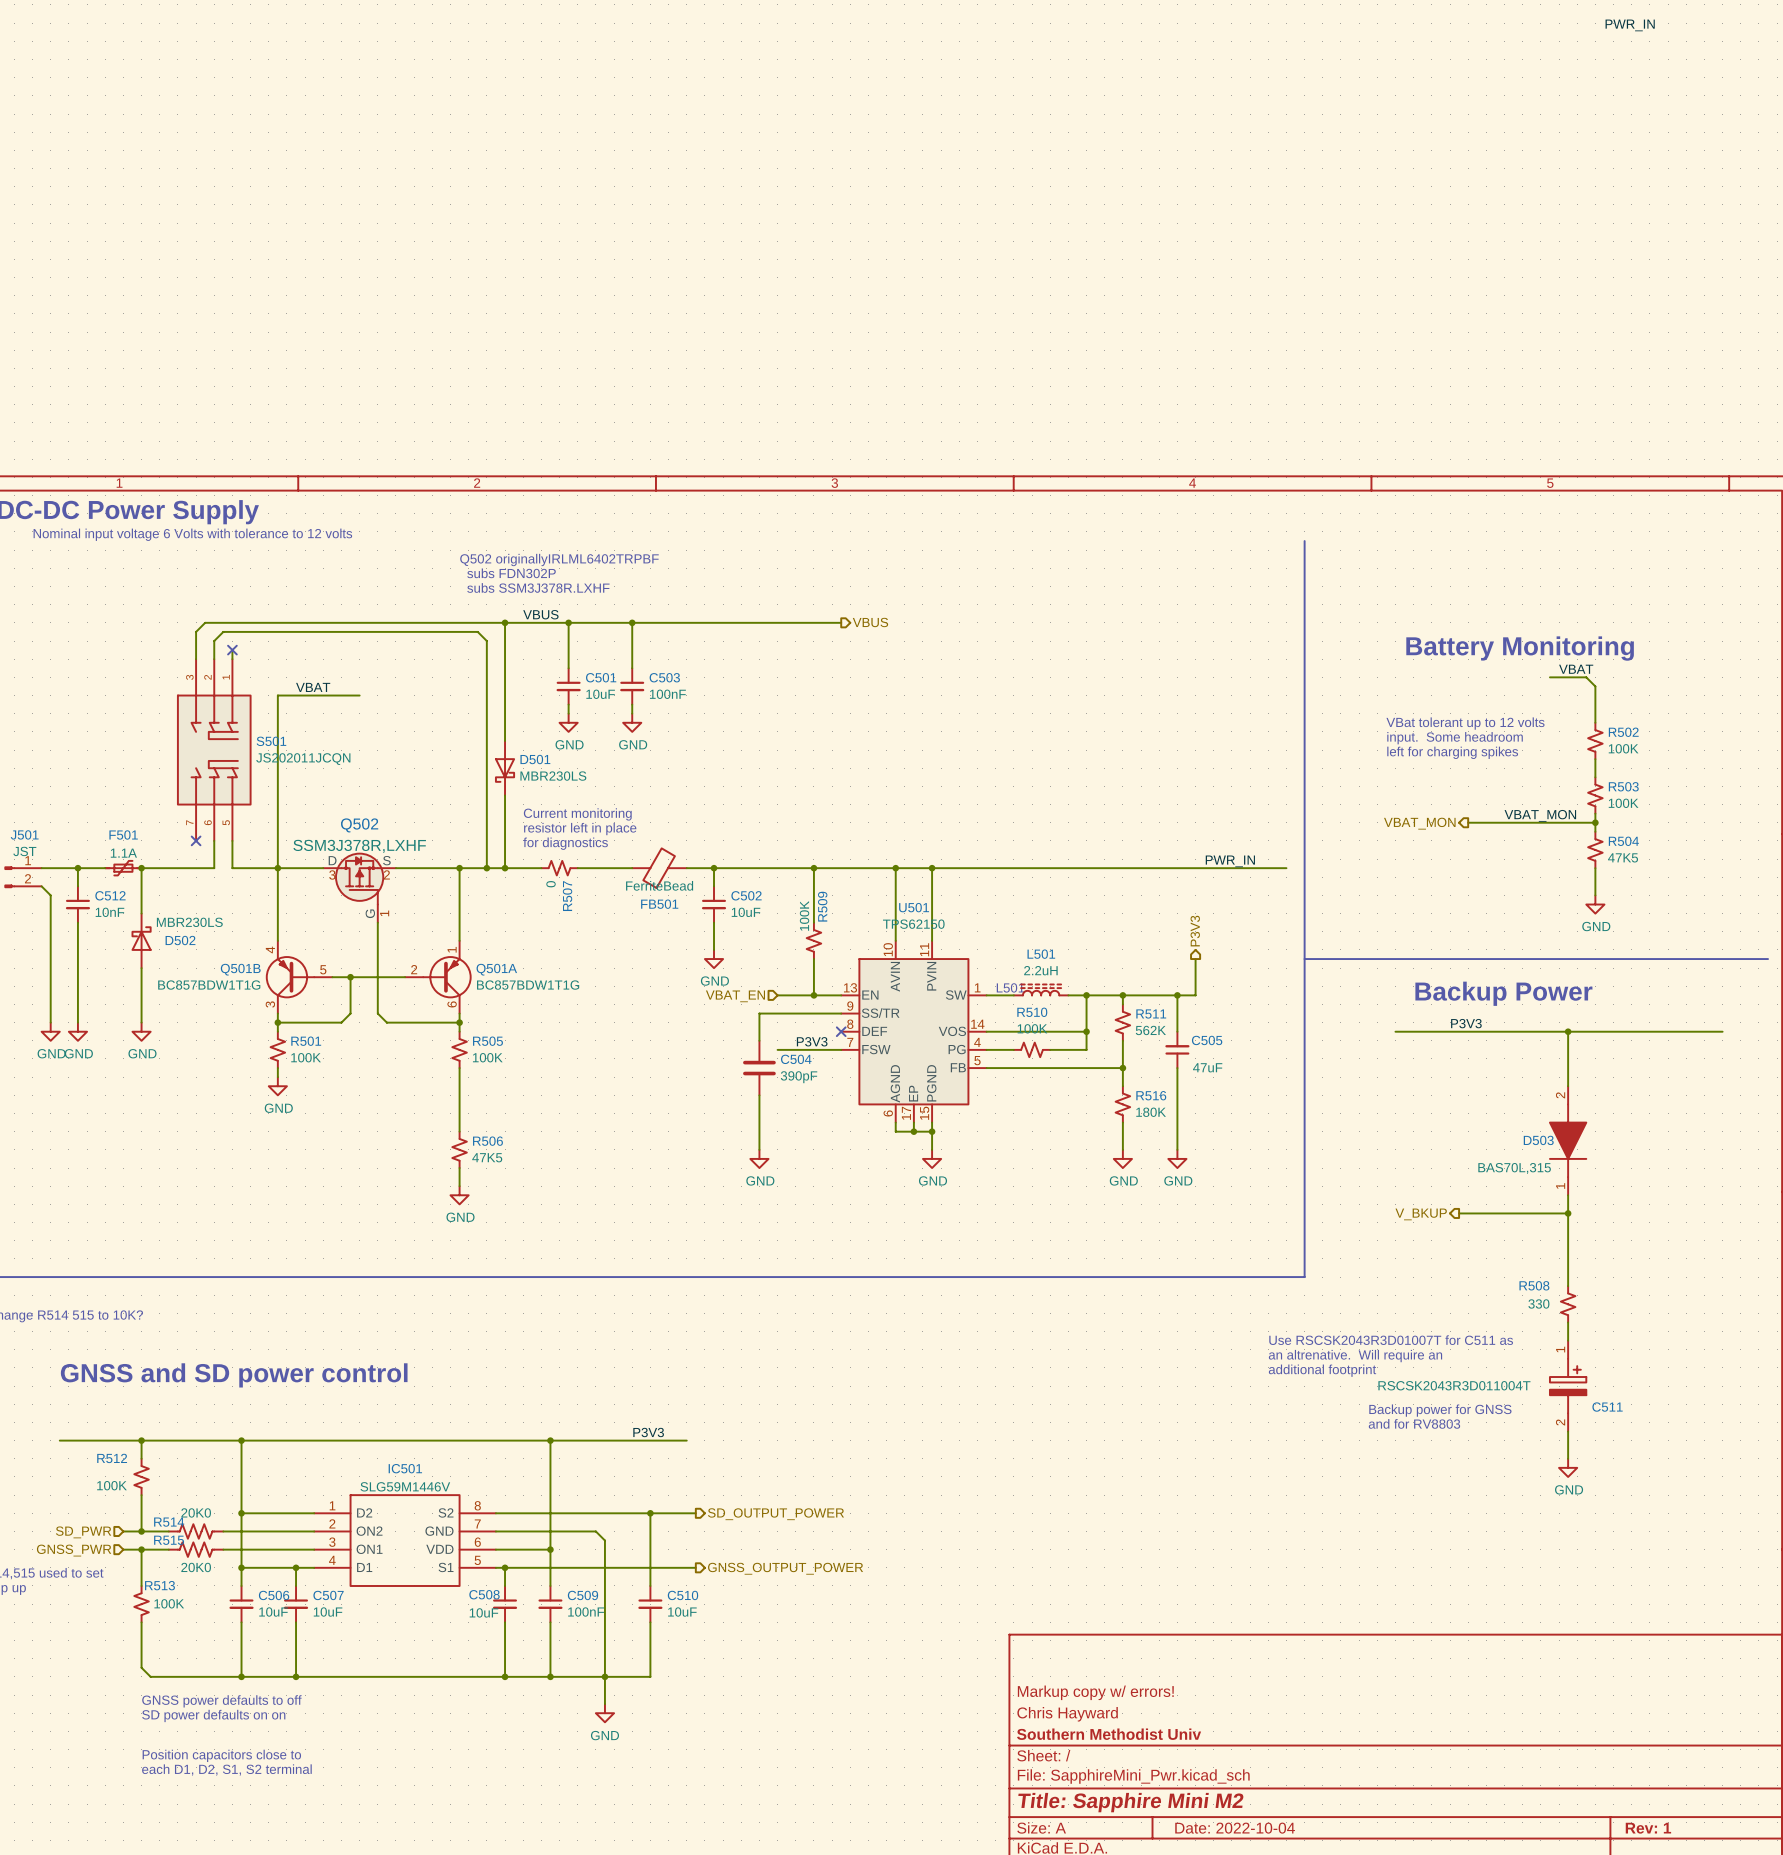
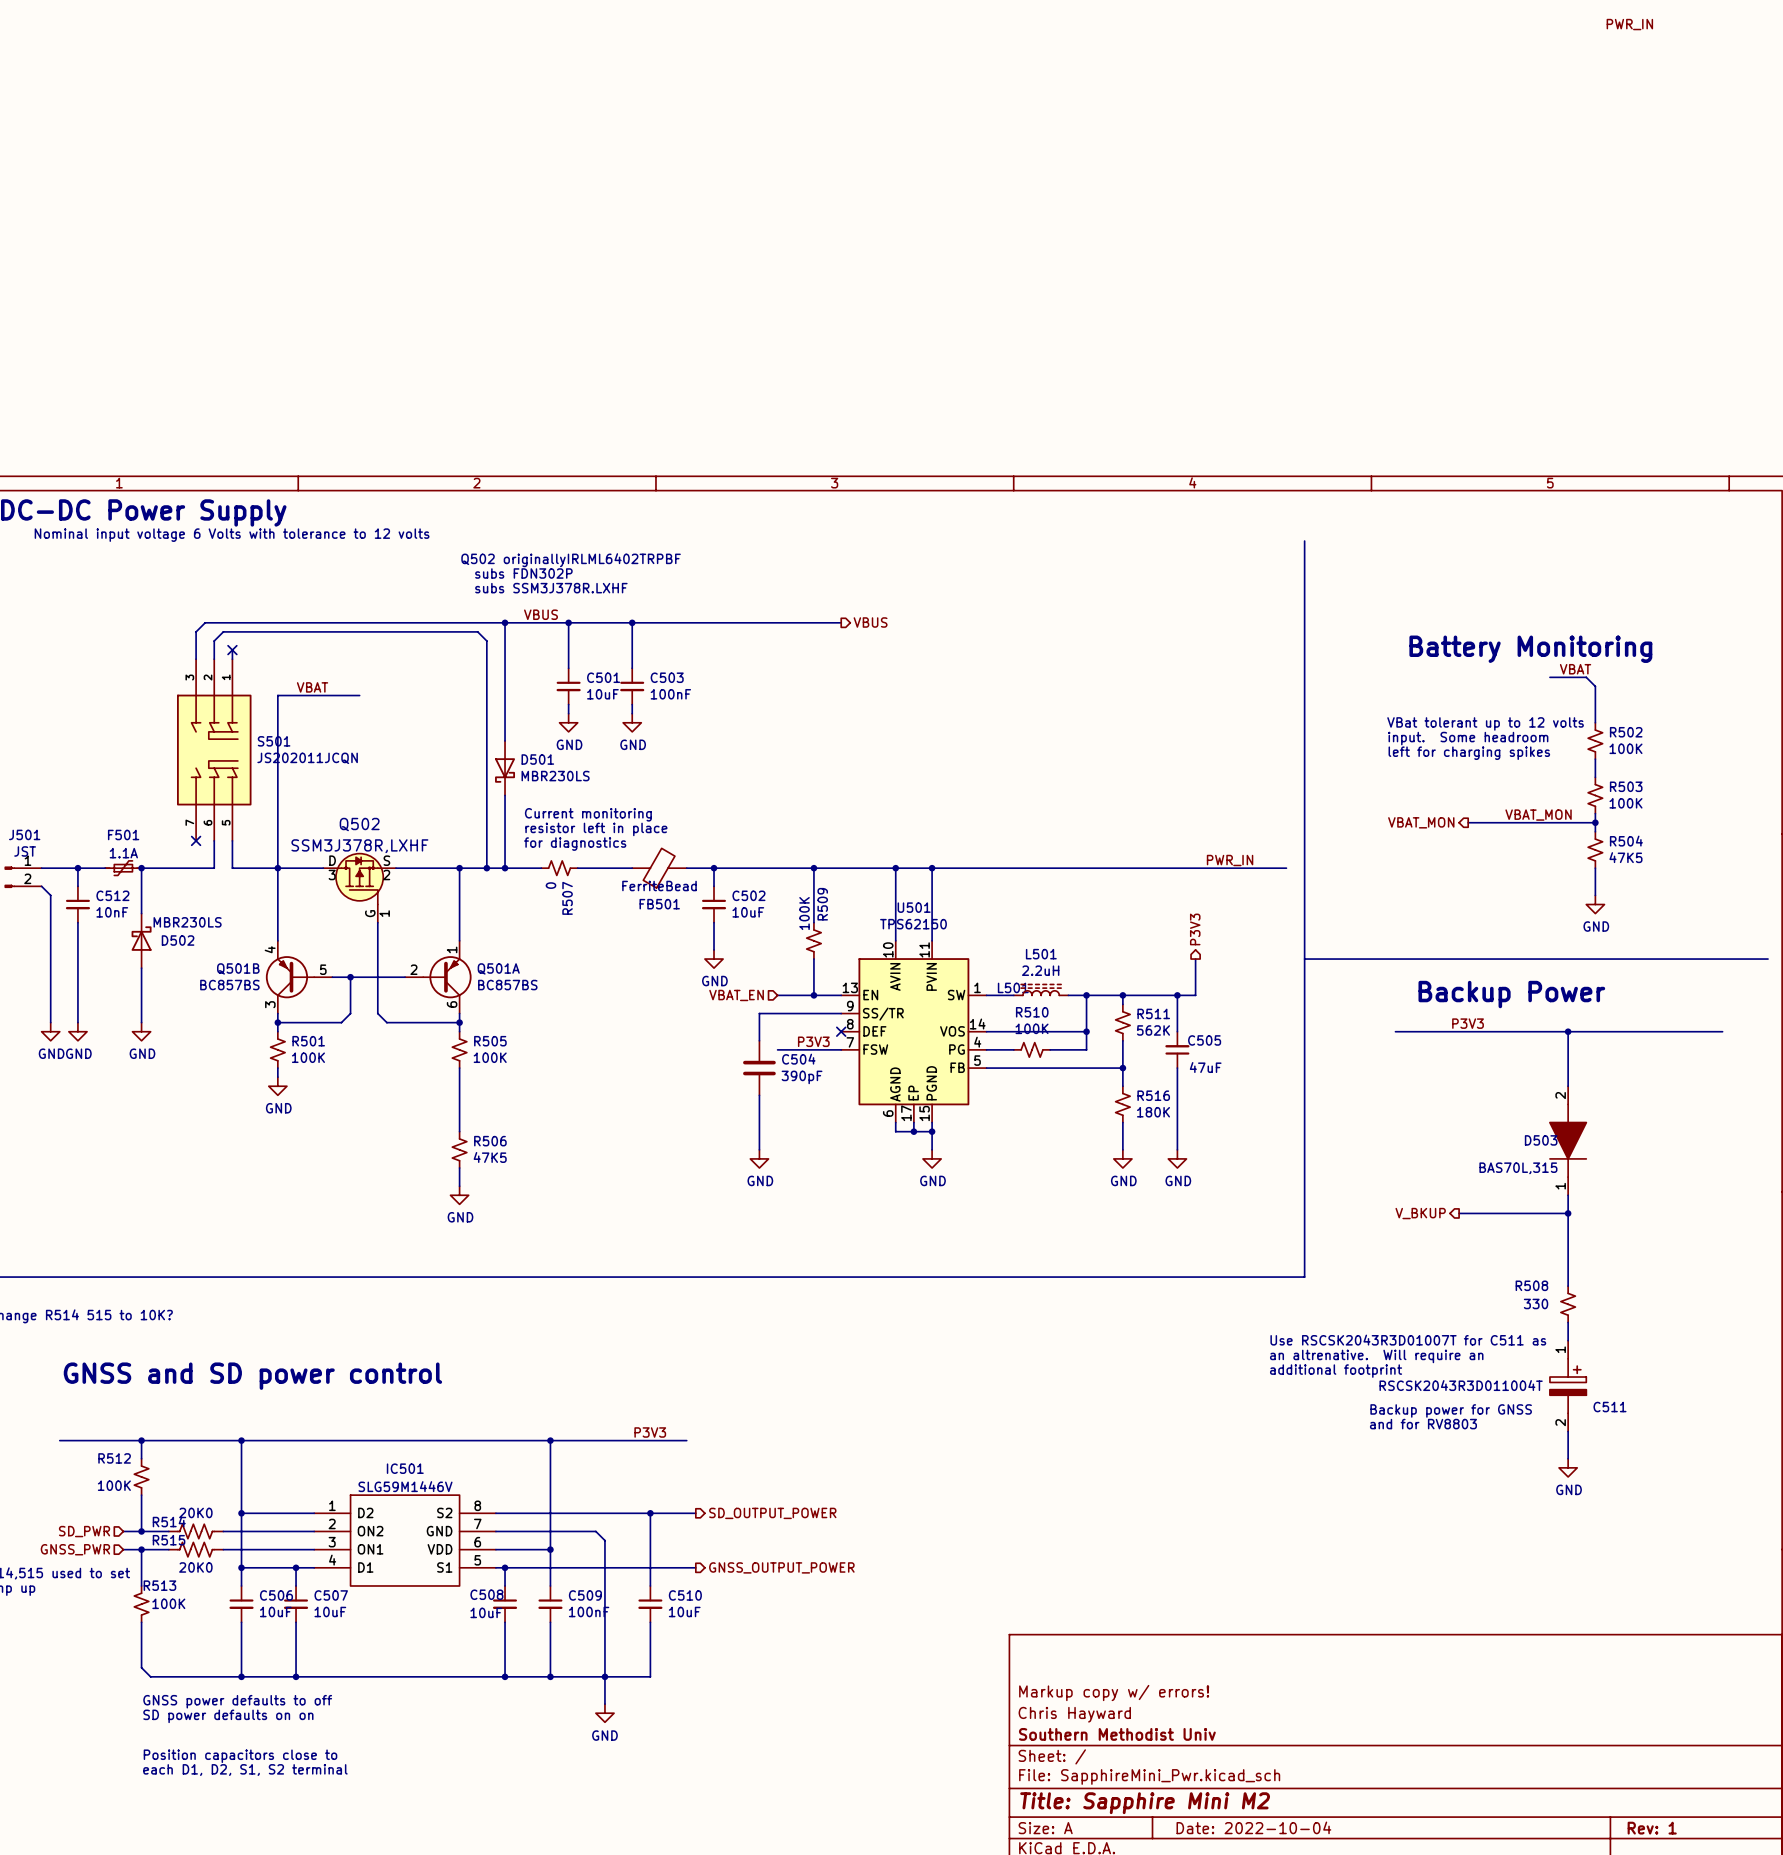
Q501B value: BC857BDW1T1G (209, 985) -> BC857BS (229, 985)
Q501A value: BC857BDW1T1G (528, 985) -> BC857BS (507, 985)

